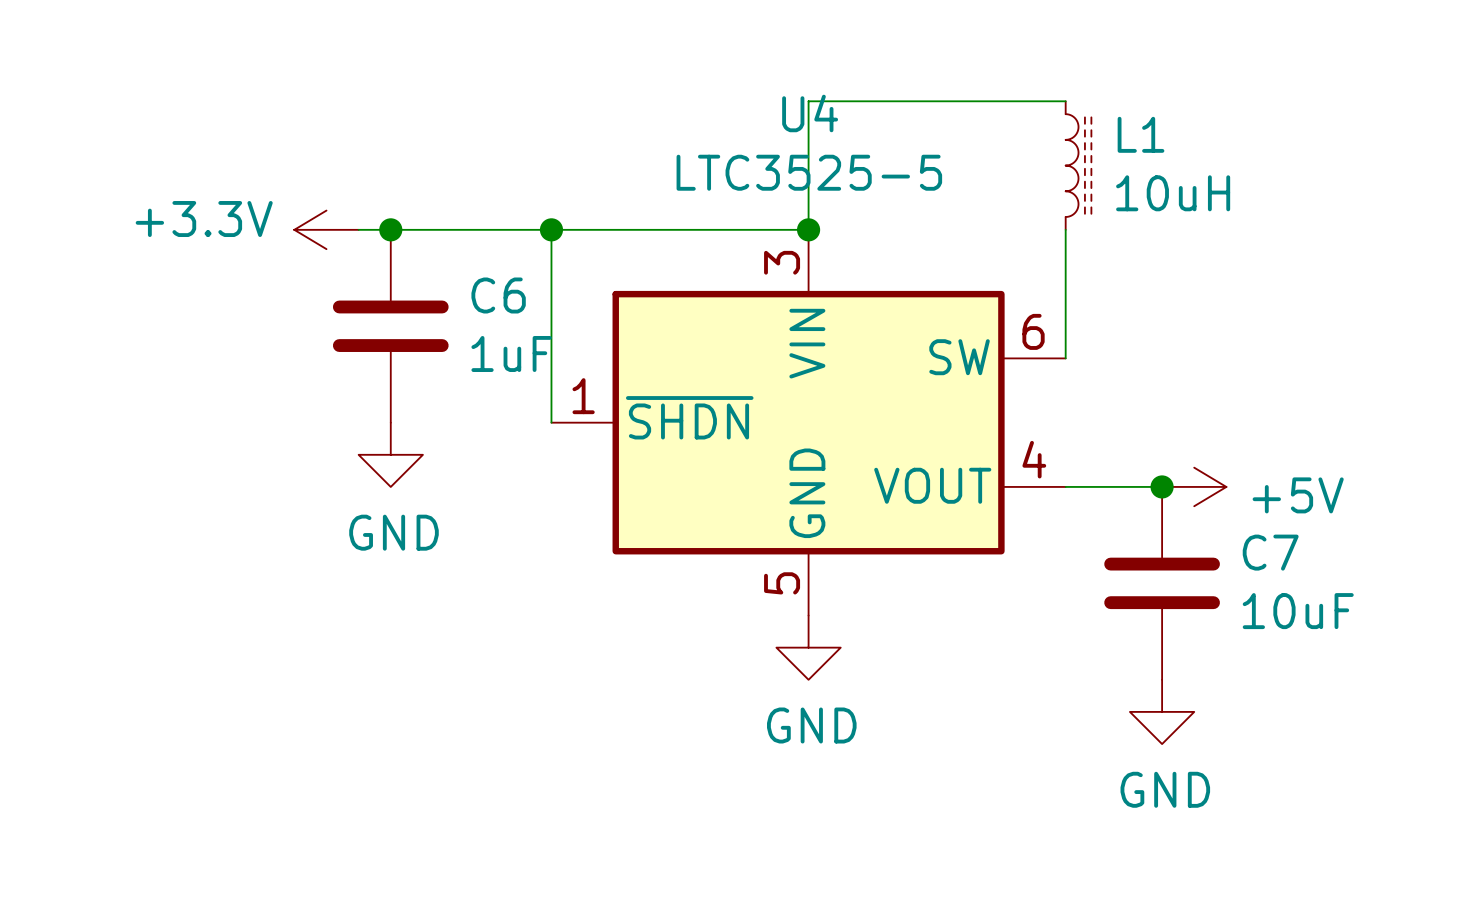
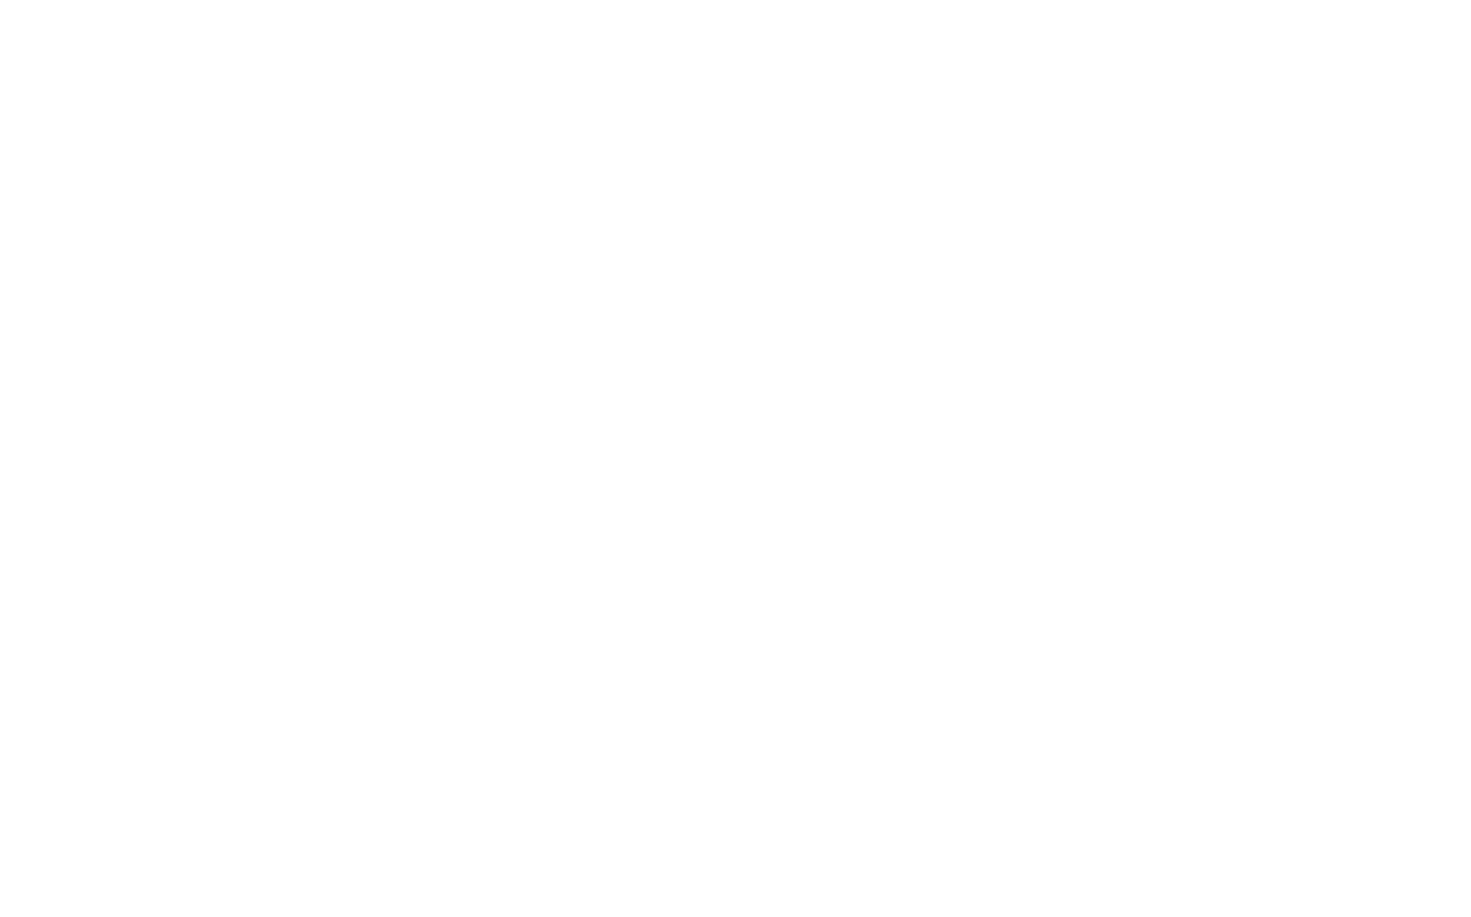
wire: (1065, 101) (808, 101) (808, 229) (358, 229) -> none
L1: 10uH (1078, 165) -> none
power symbol: +3.3V (326, 229) -> none
junction: (390, 229) -> none
wire: (551, 229) (551, 422) -> none
junction: (551, 229) -> none
junction: (808, 229) -> none
wire: (1065, 229) (1065, 358) -> none
C6: 1uF (390, 326) -> none
U4: LTC3525-5 (808, 422) -> none
power symbol: GND (390, 454) -> none
wire: (1065, 486) (1162, 486) -> none
junction: (1162, 486) -> none
power symbol: +5V (1194, 486) -> none
C7: 10uF (1162, 583) -> none
power symbol: GND (808, 647) -> none
power symbol: GND (1162, 711) -> none

